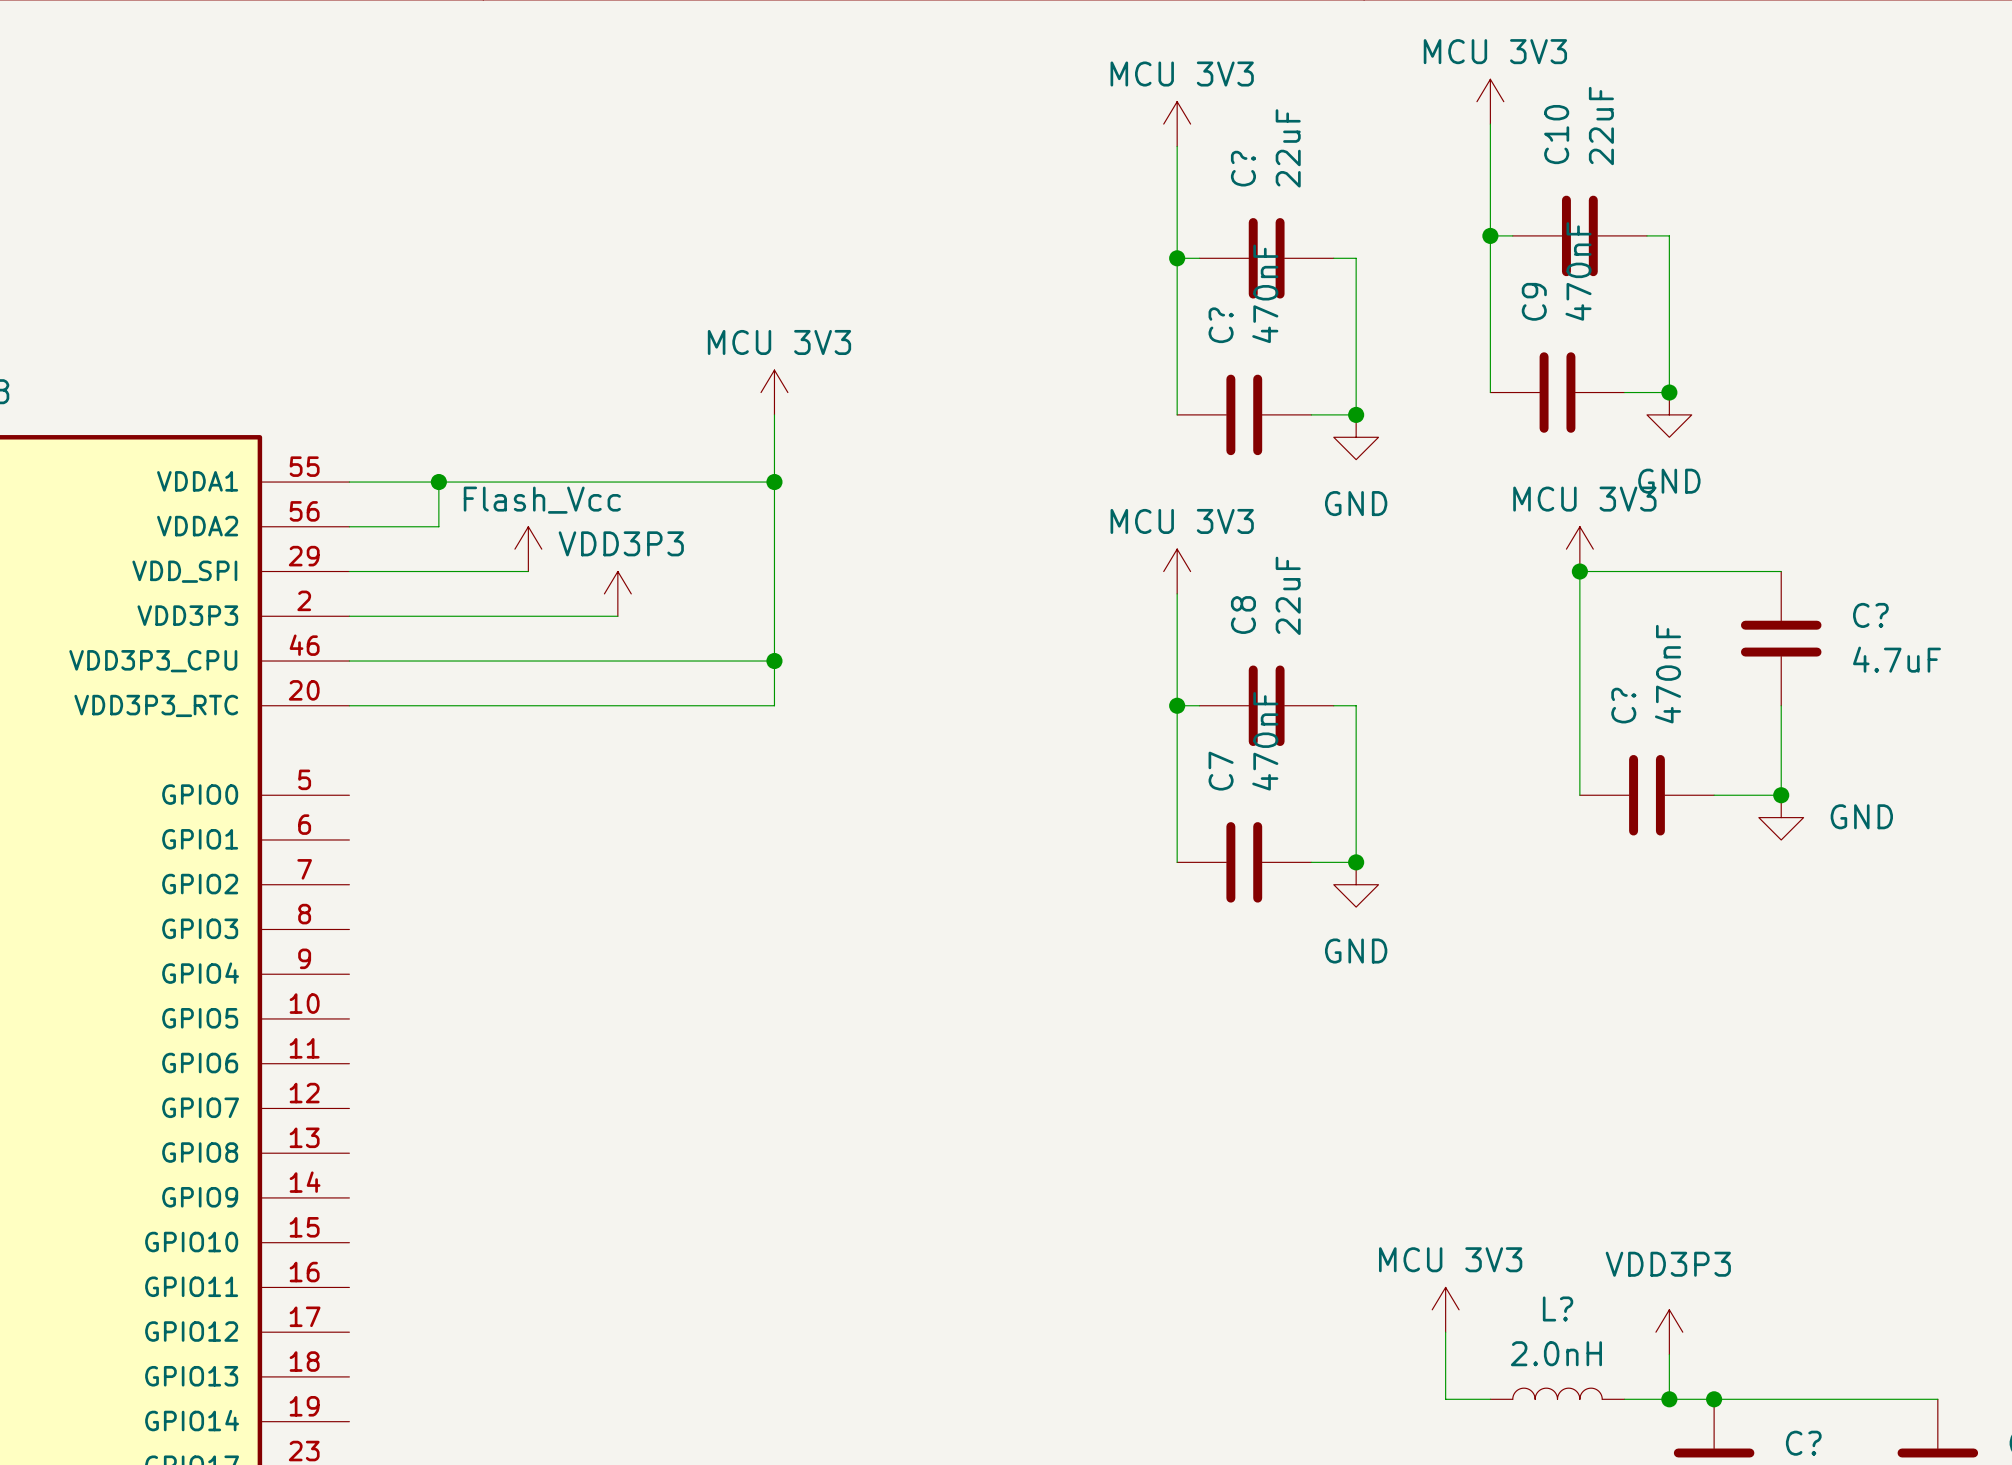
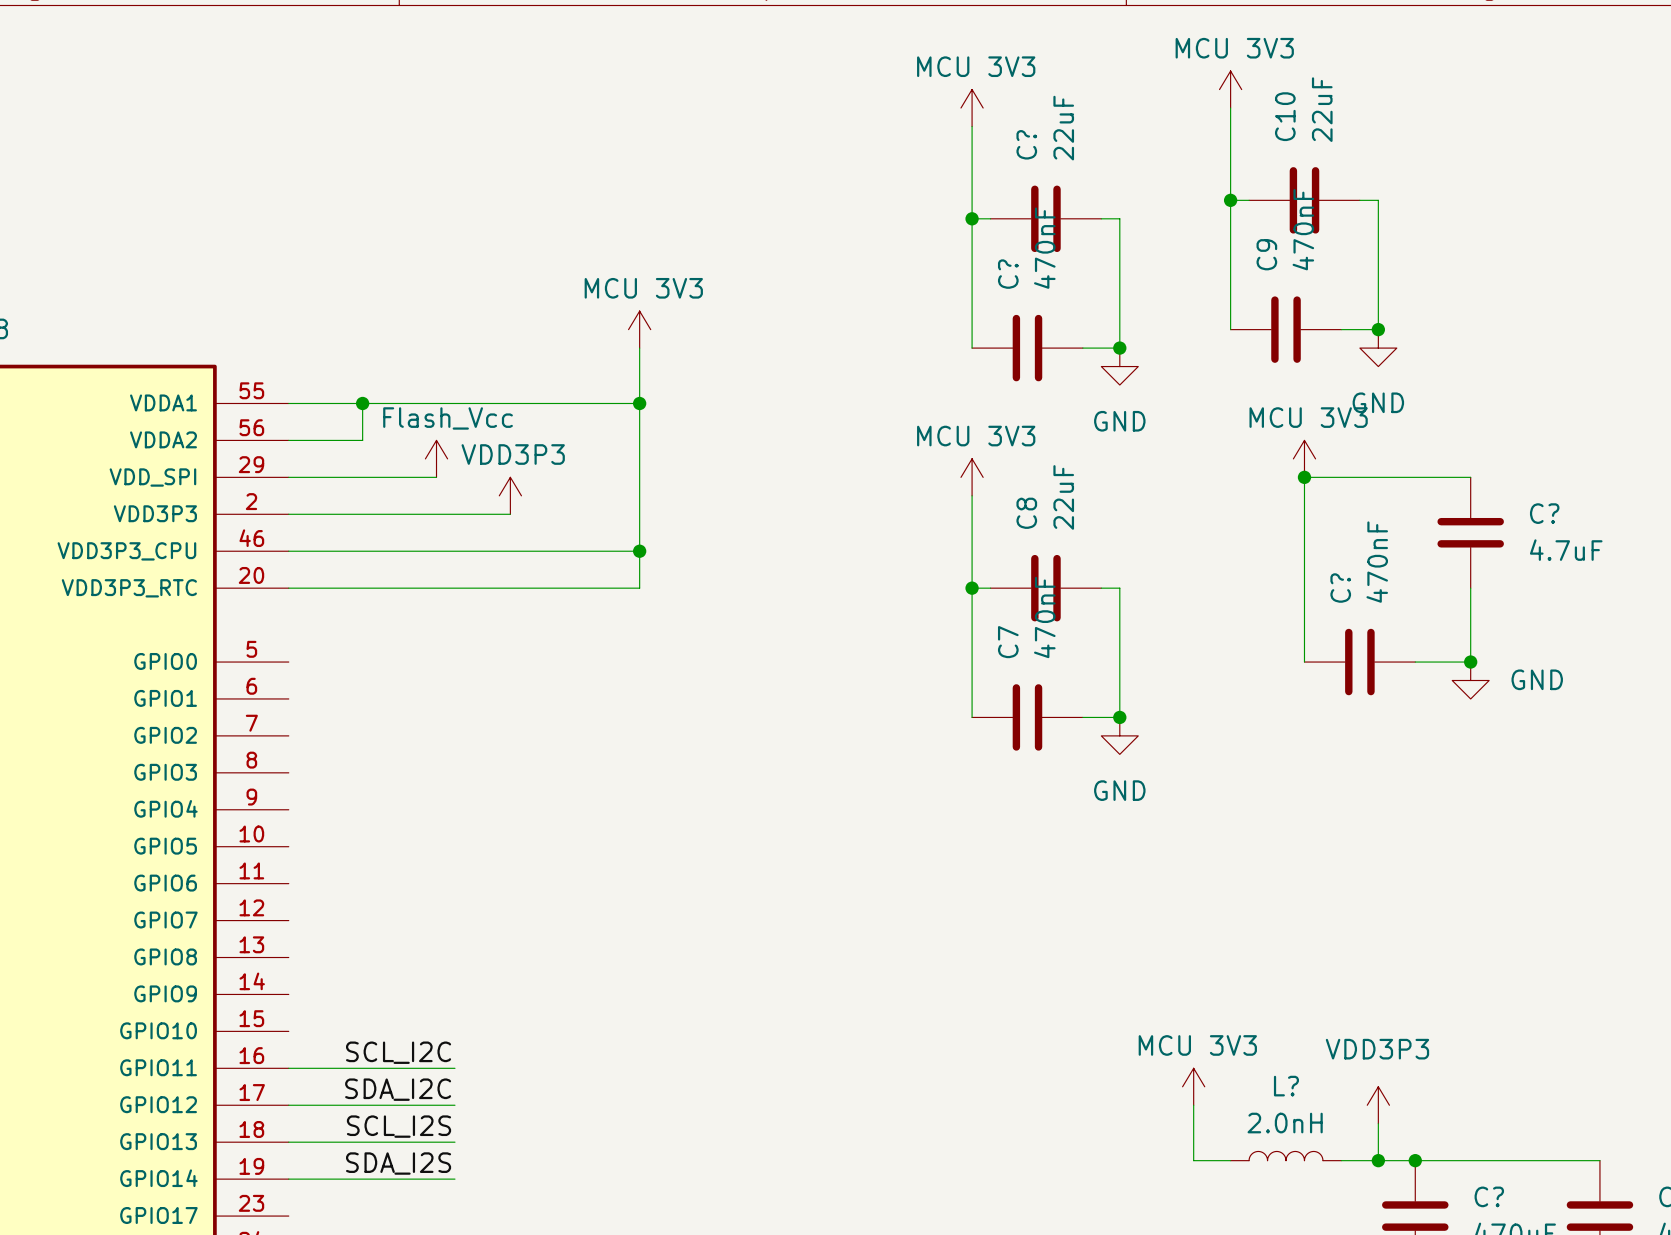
label: none -> SCL_I2C (398, 1052)
wire: none -> (288, 1068) (454, 1068)
label: none -> SDA_I2C (398, 1089)
wire: none -> (288, 1105) (454, 1105)
label: none -> SCL_I2S (398, 1126)
wire: none -> (288, 1142) (454, 1142)
label: none -> SDA_I2S (398, 1163)
wire: none -> (288, 1179) (454, 1179)

